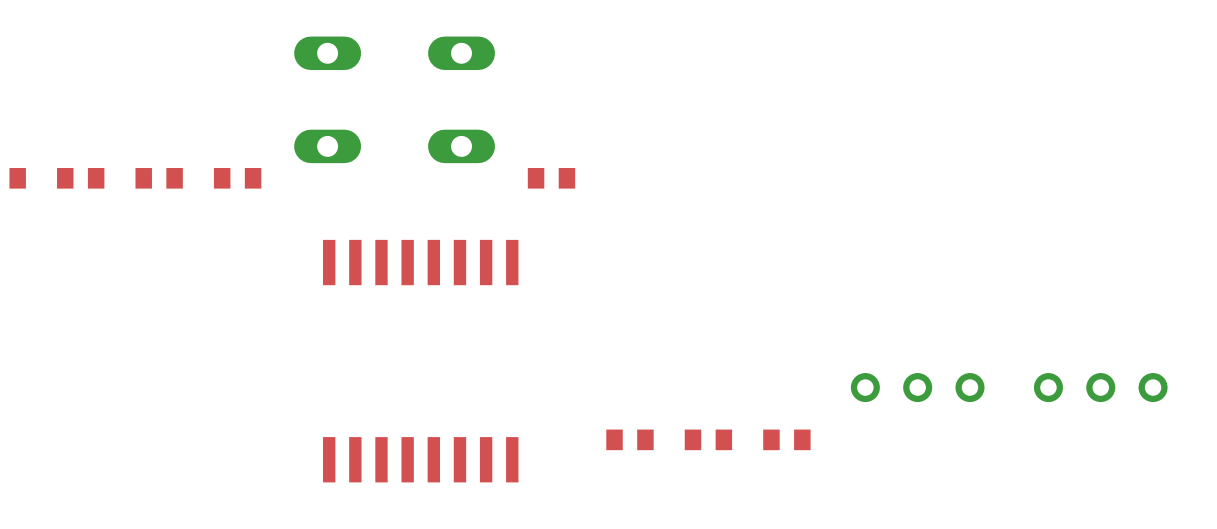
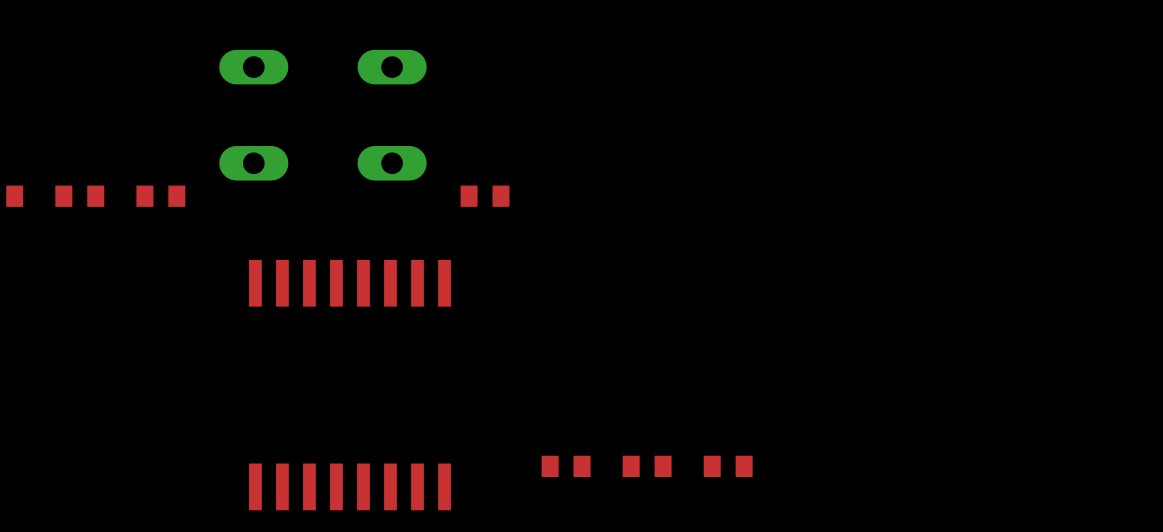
part: (917, 387) -> none
part: (1100, 387) -> none

